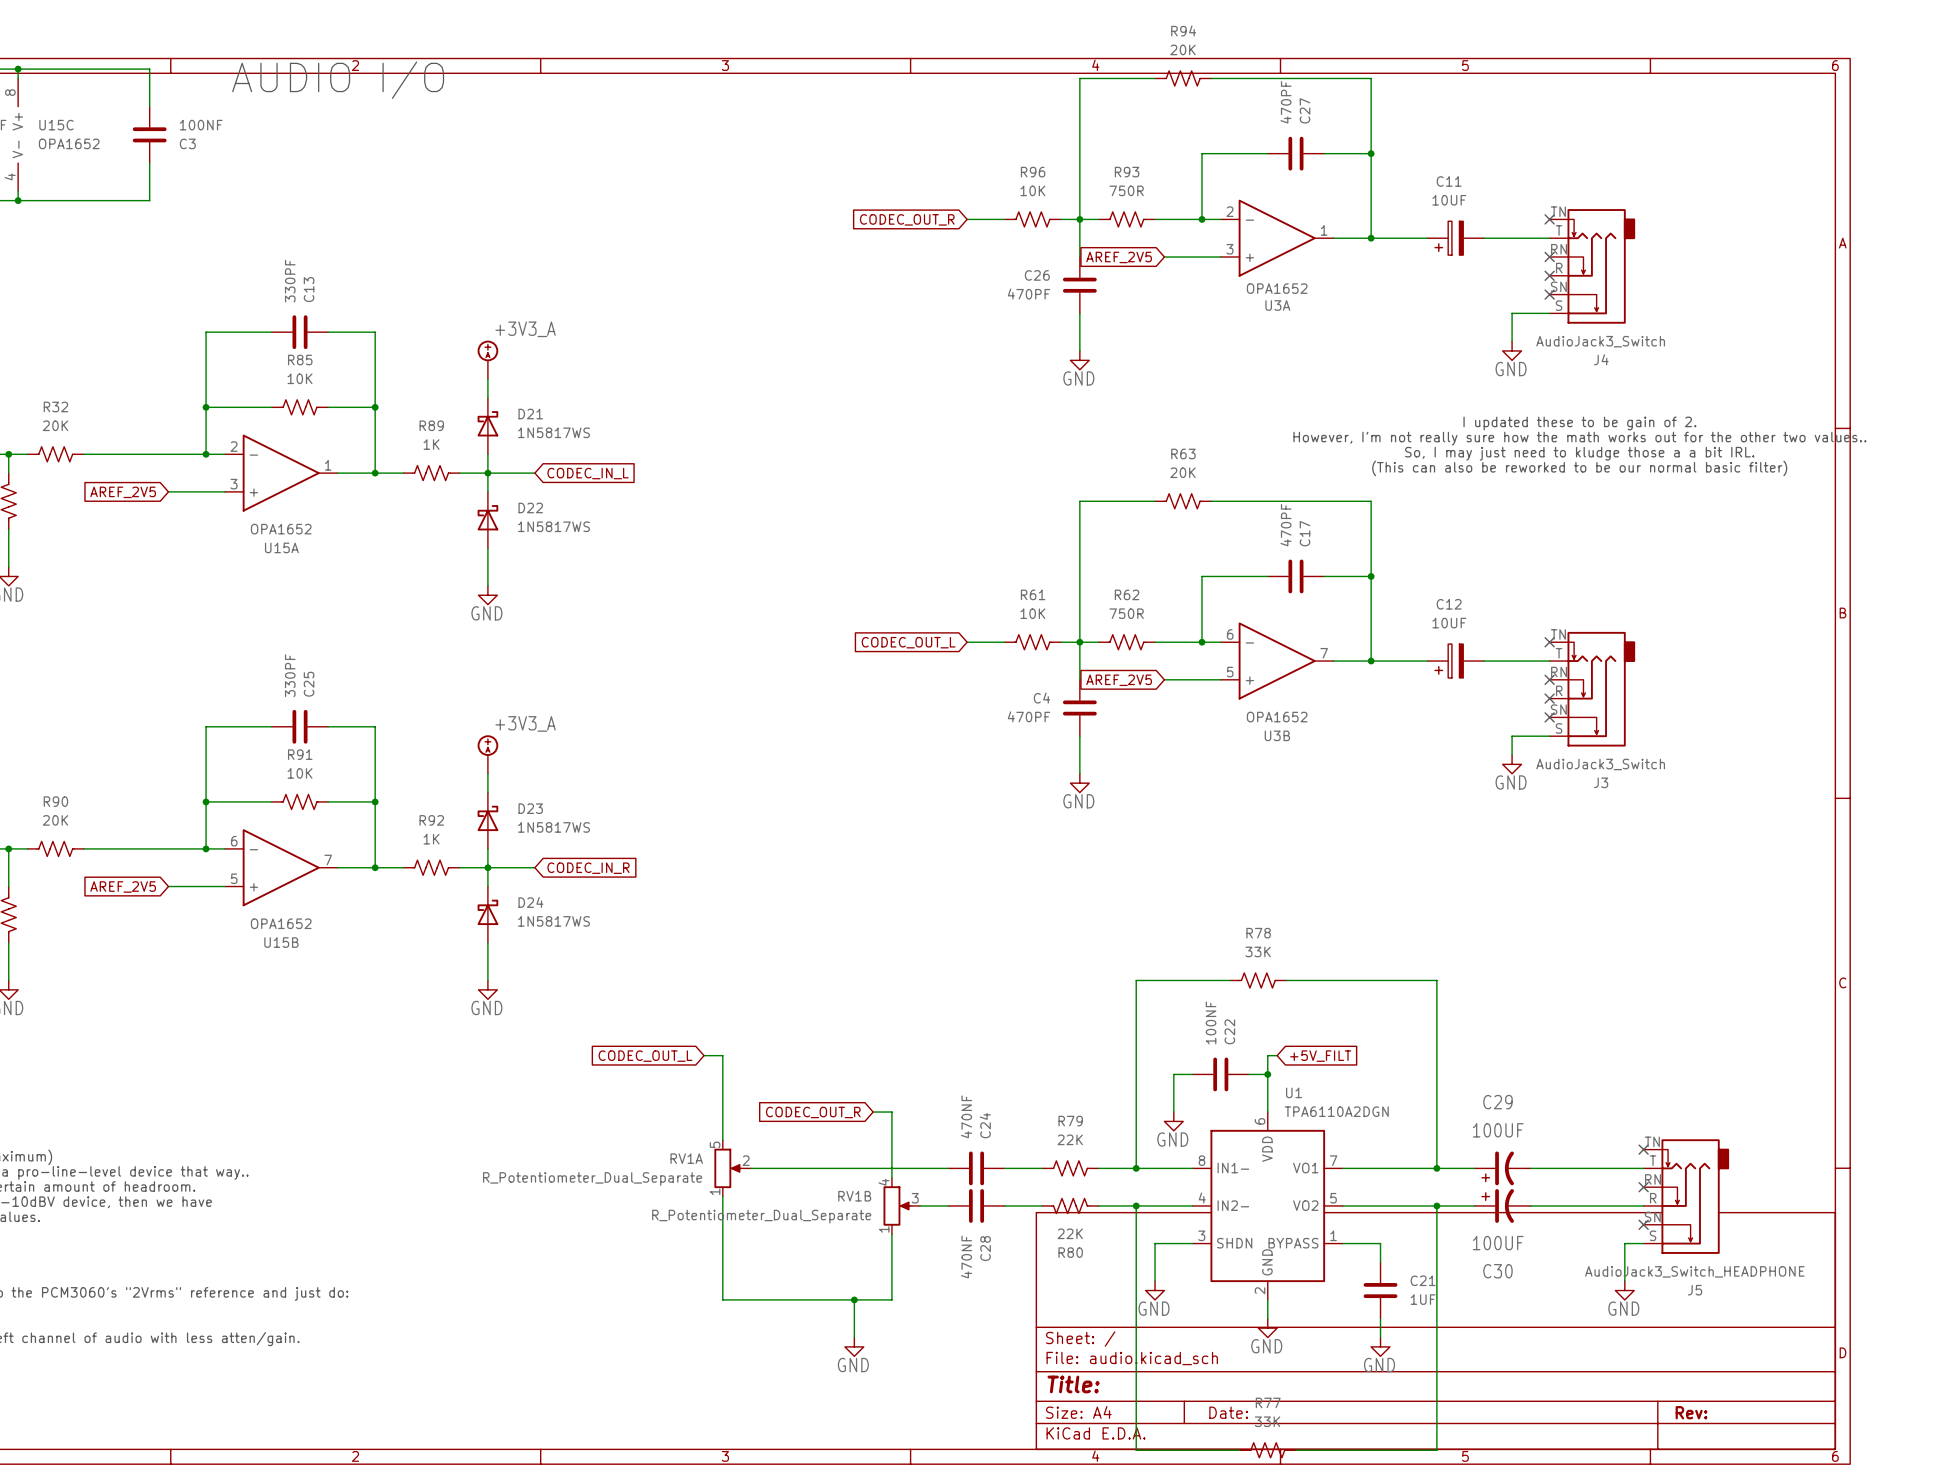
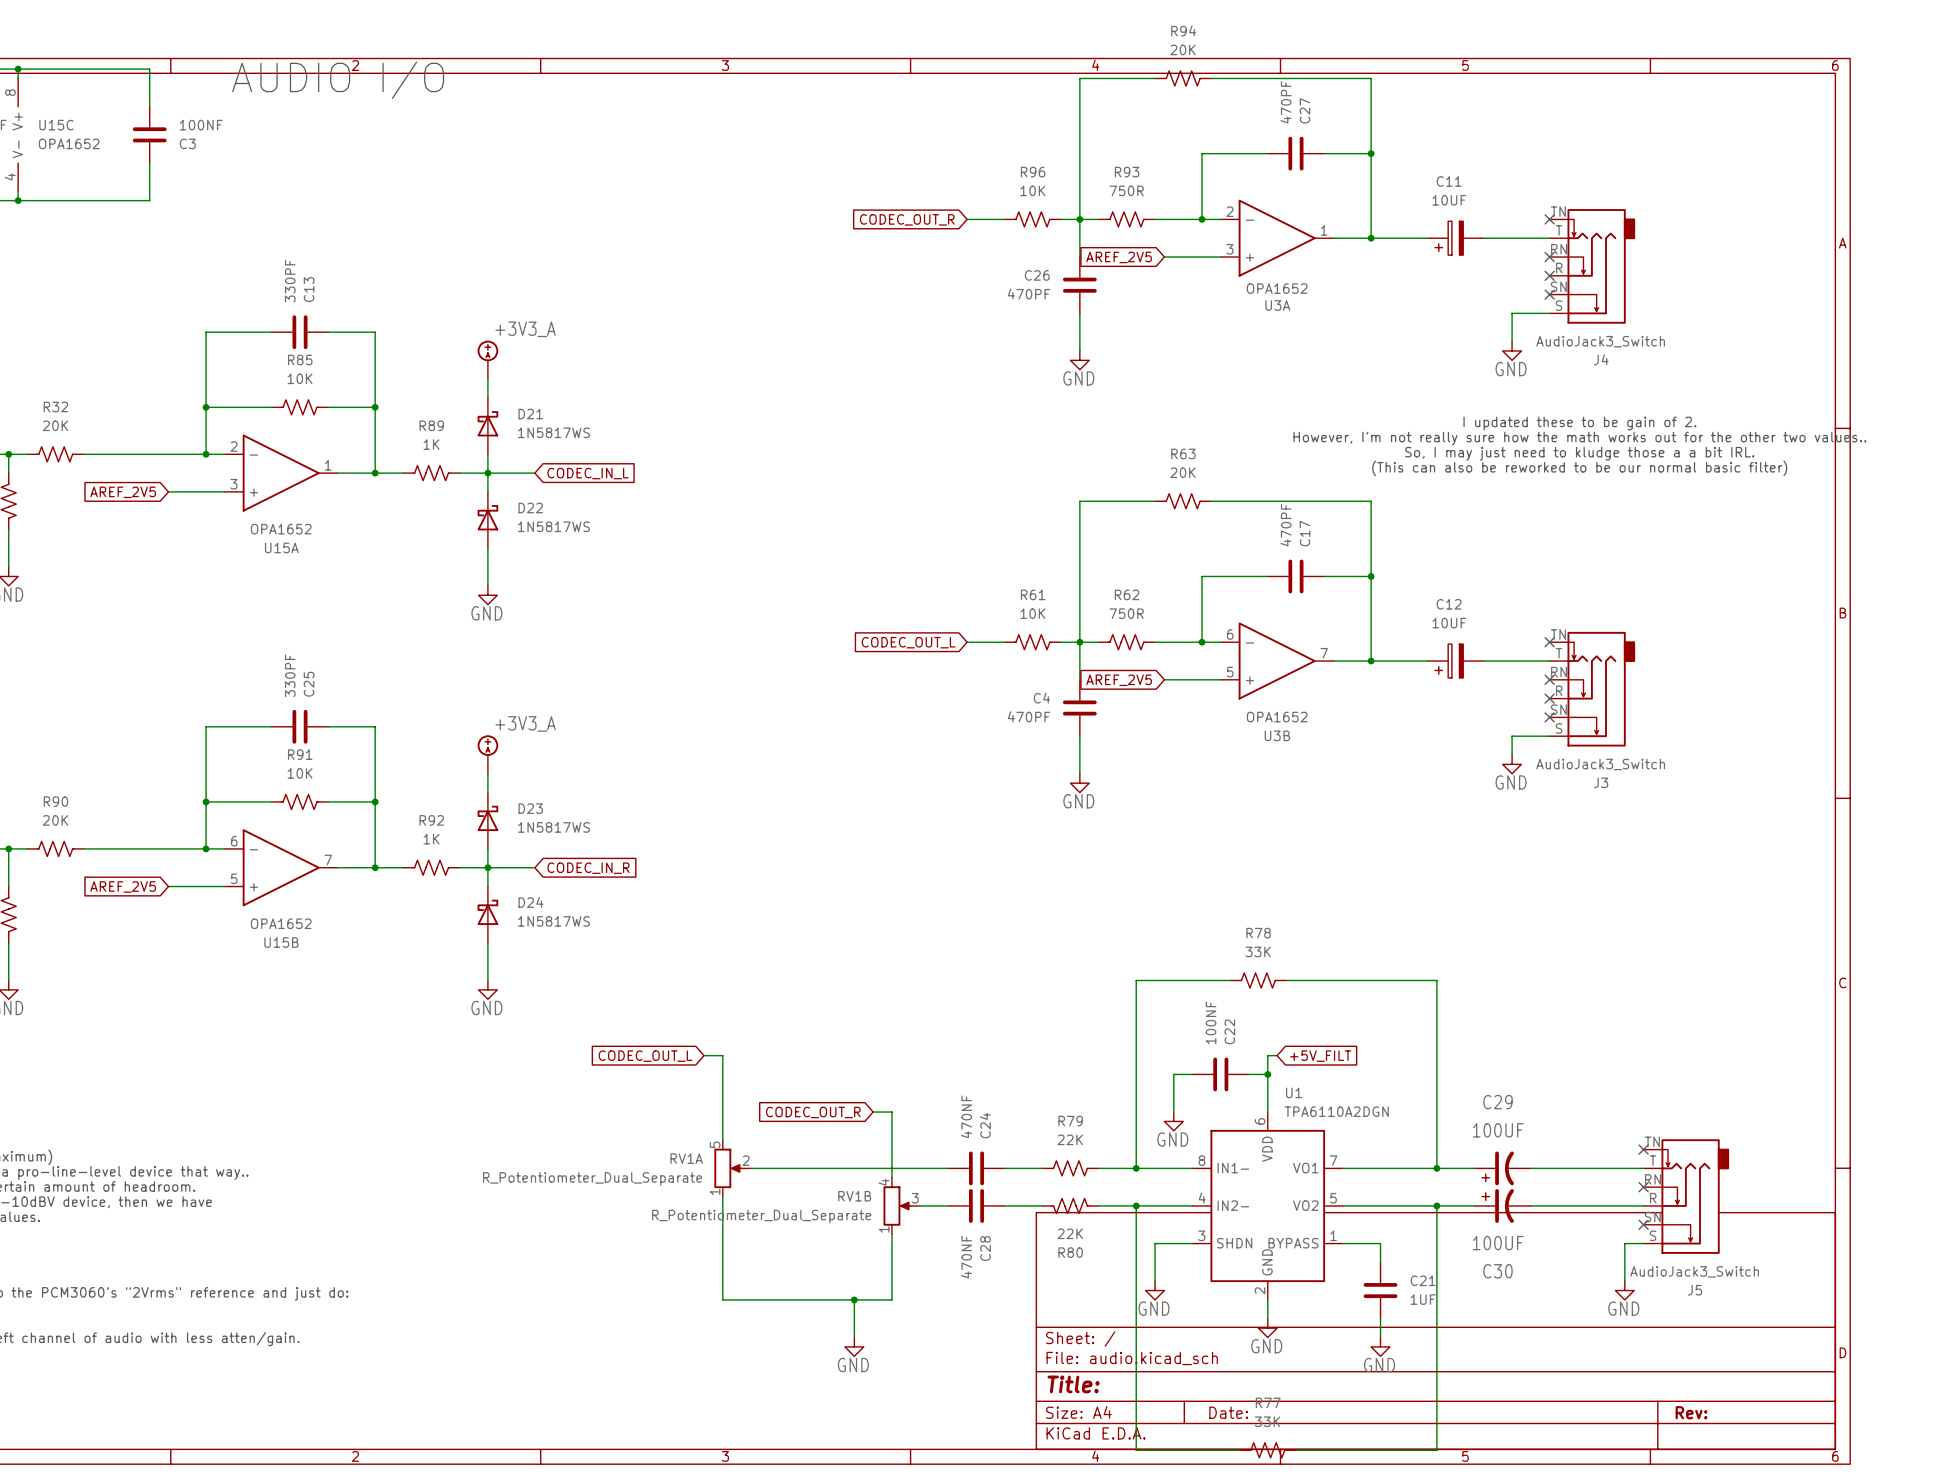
J5 value: AudioJack3_Switch_HEADPHONE (1694, 1271) -> AudioJack3_Switch (1694, 1271)

